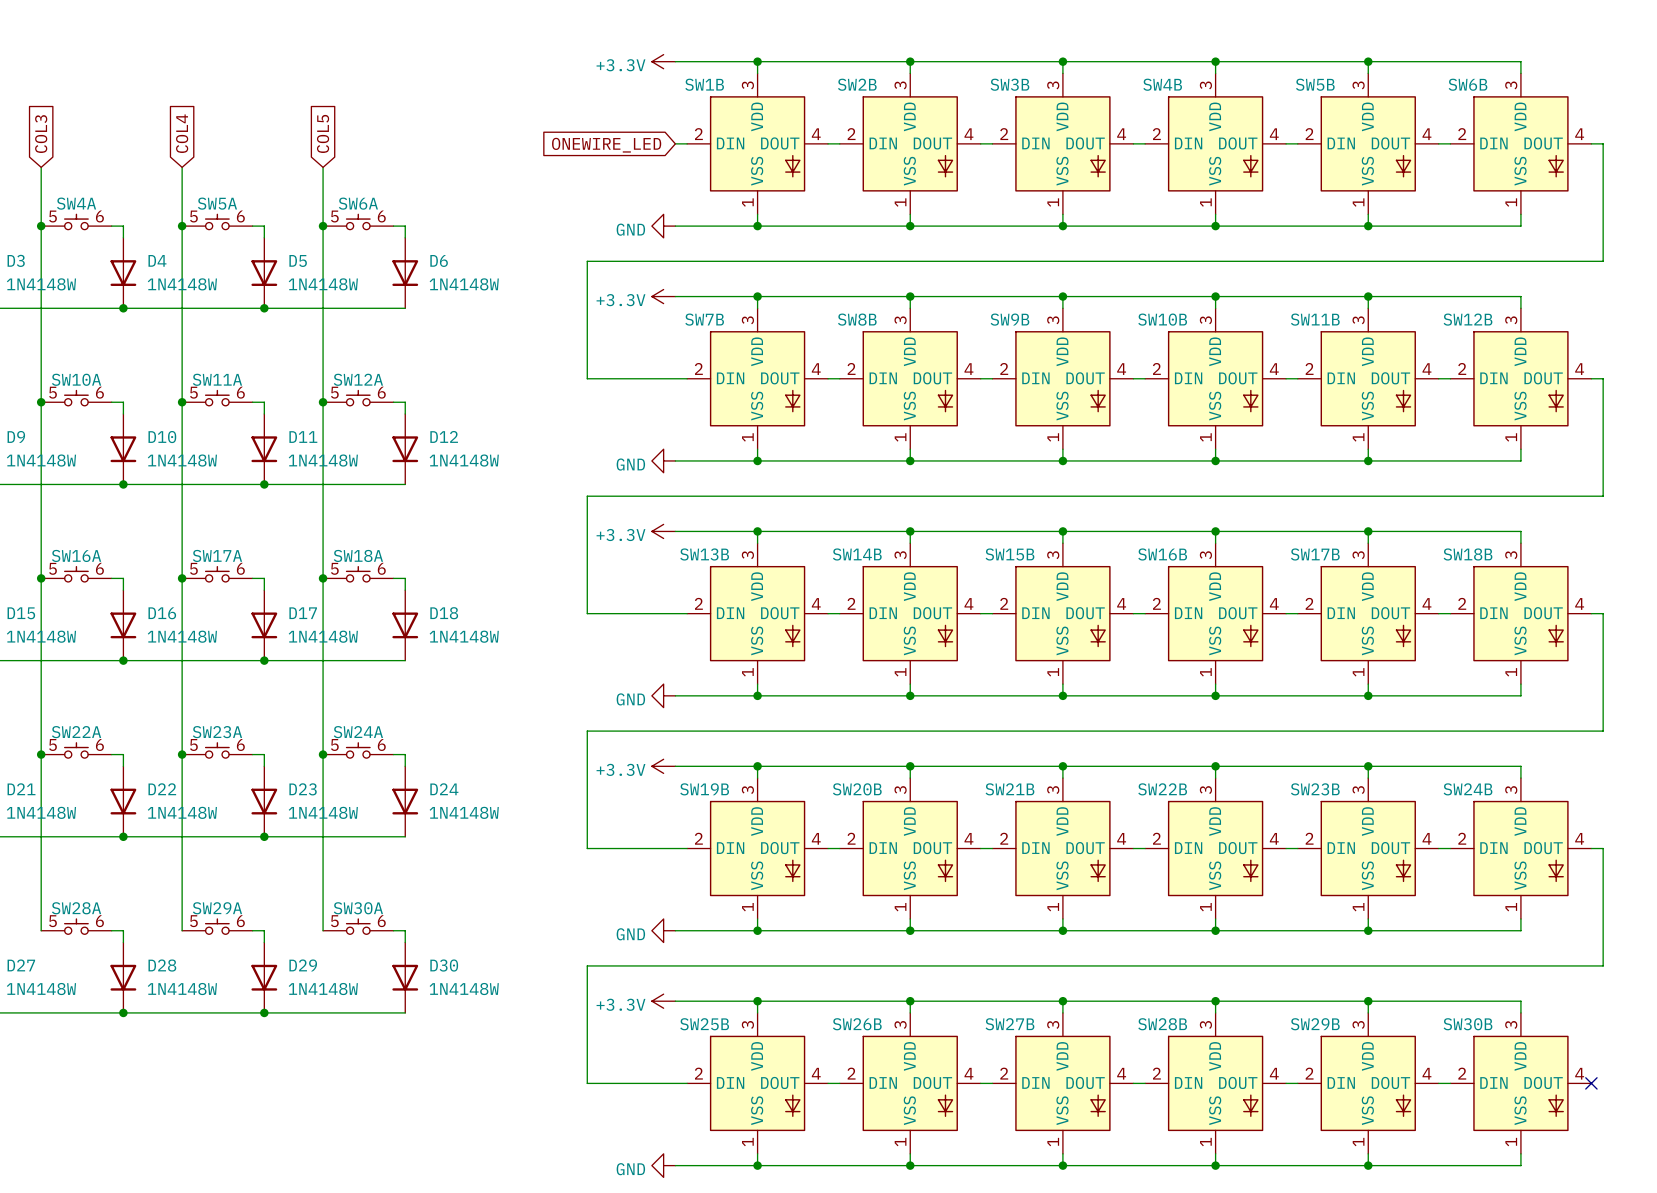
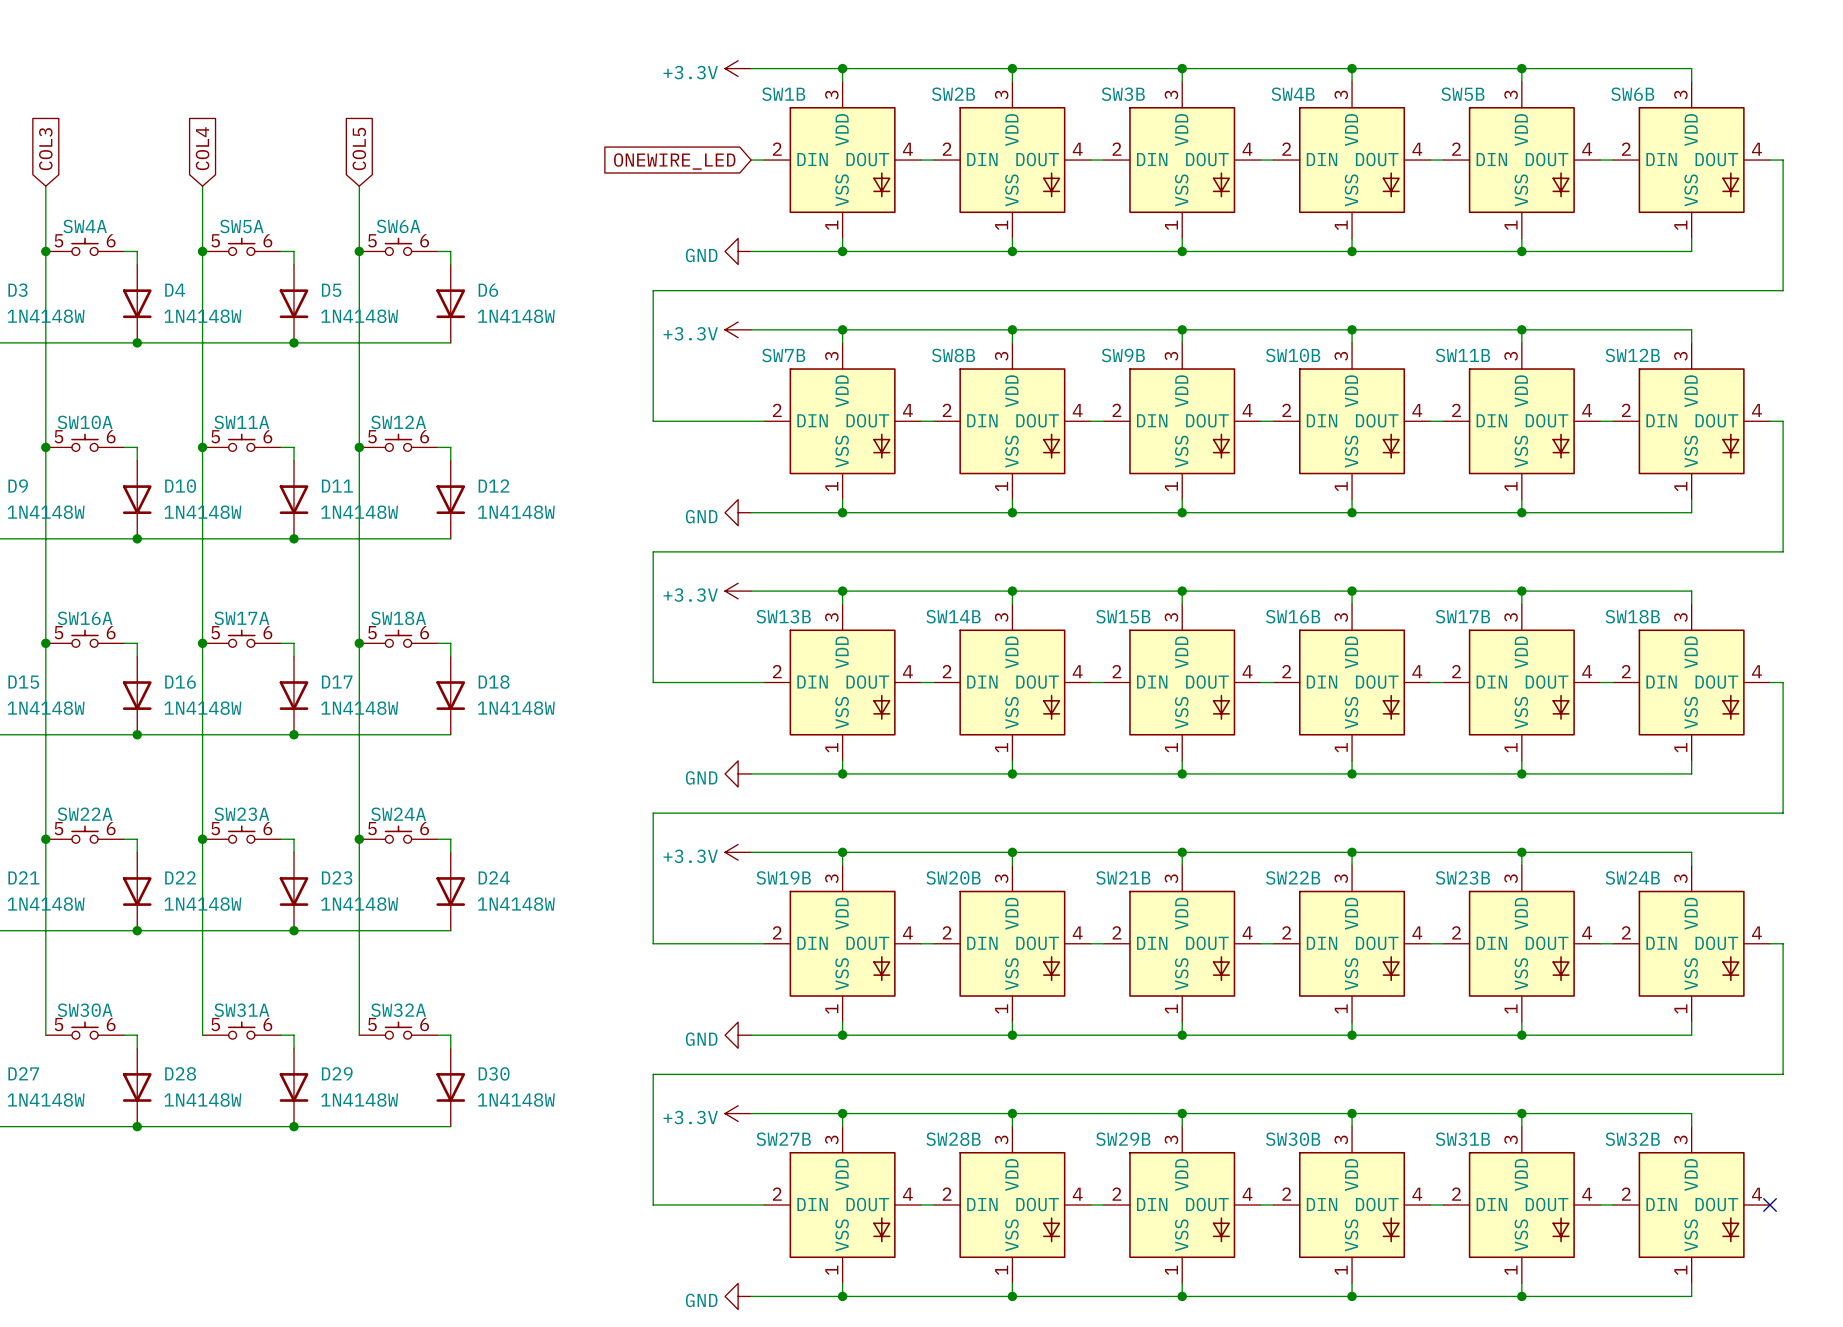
SW28A name: SW28A (76, 908) -> SW30A (85, 1010)
SW29A name: SW29A (217, 908) -> SW31A (241, 1010)
SW30A name: SW30A (358, 908) -> SW32A (398, 1010)
SW25B name: SW25B (704, 1024) -> SW27B (783, 1139)
SW26B name: SW26B (857, 1024) -> SW28B (953, 1139)
SW27B name: SW27B (1009, 1024) -> SW29B (1123, 1139)
SW28B name: SW28B (1162, 1024) -> SW30B (1293, 1139)
SW29B name: SW29B (1315, 1024) -> SW31B (1462, 1139)
SW30B name: SW30B (1467, 1024) -> SW32B (1632, 1139)

